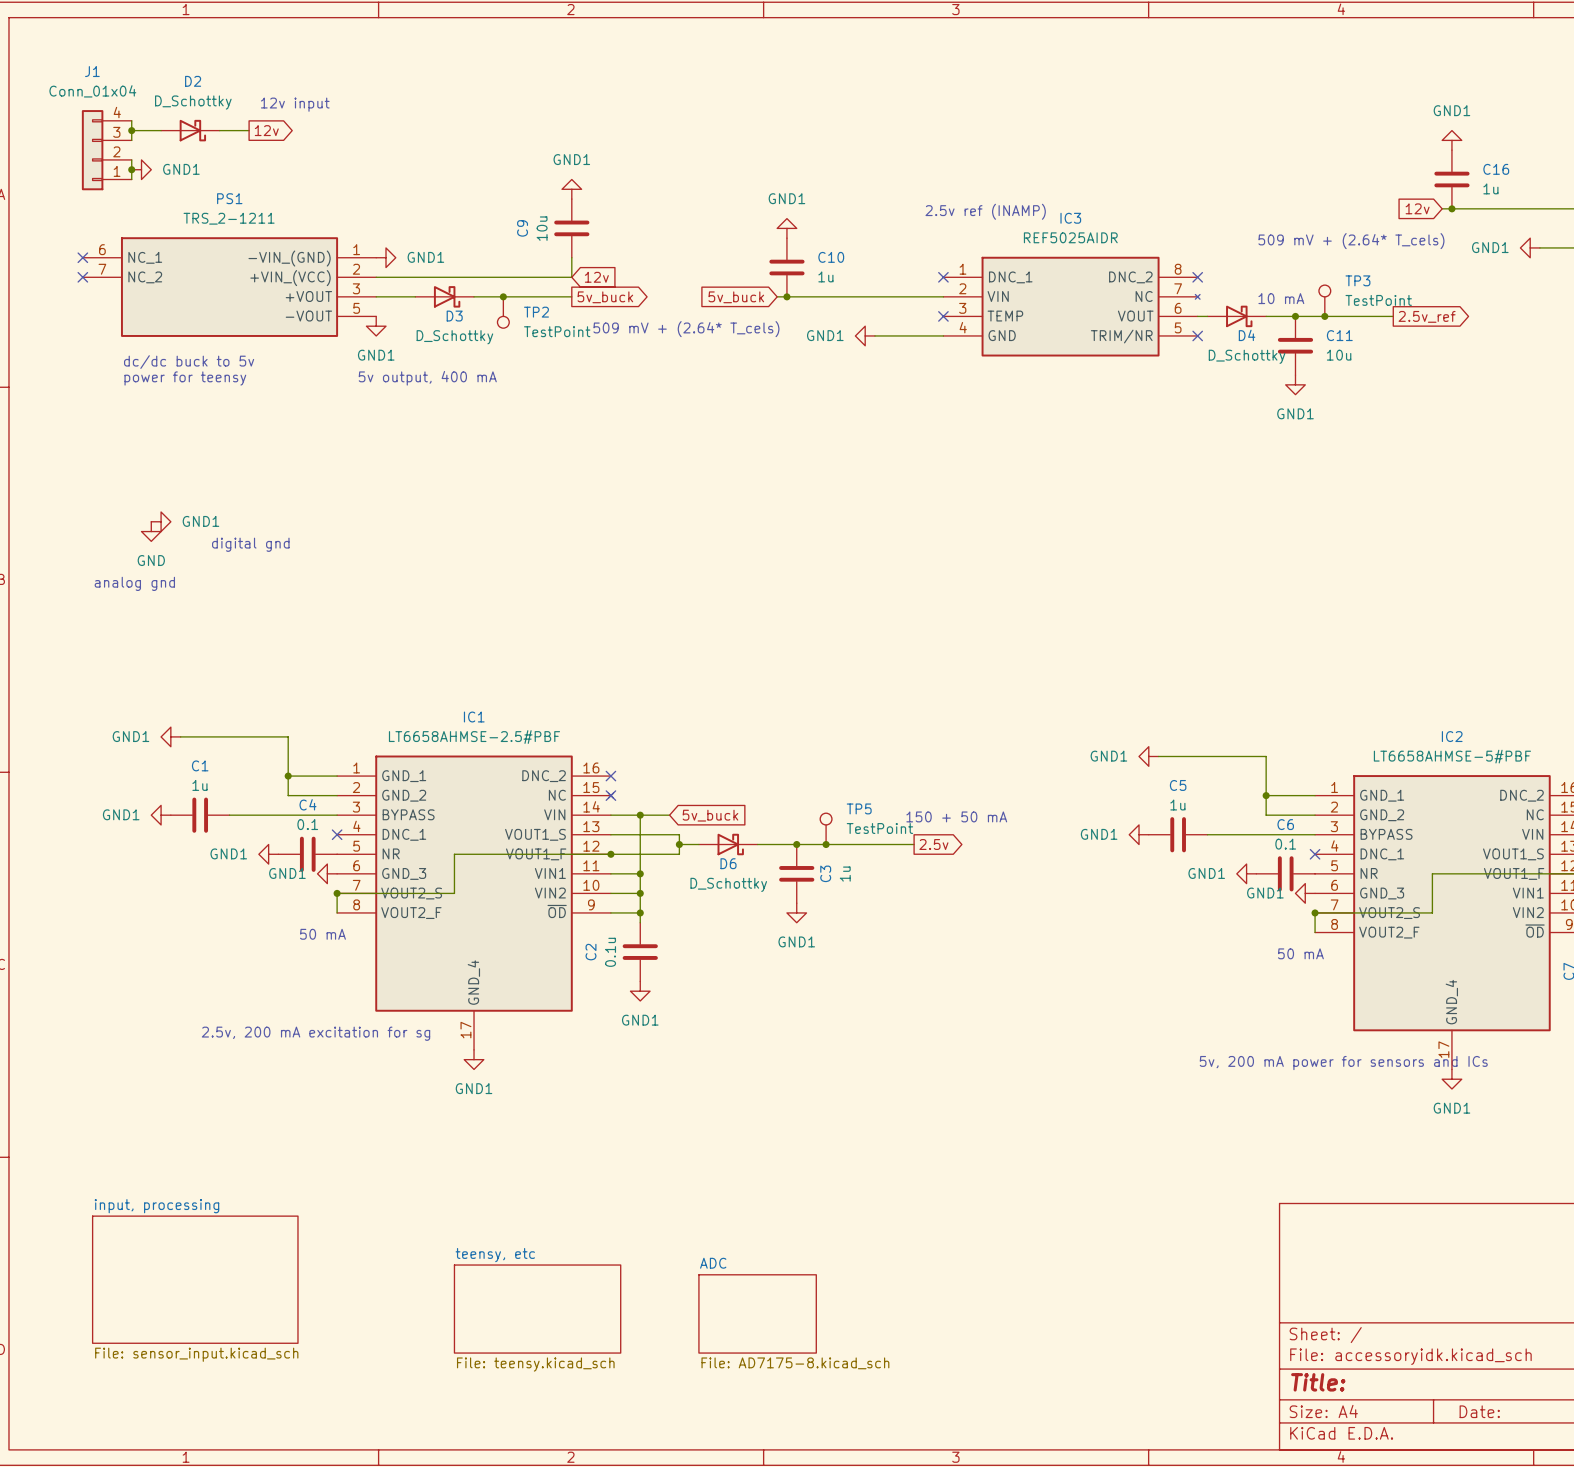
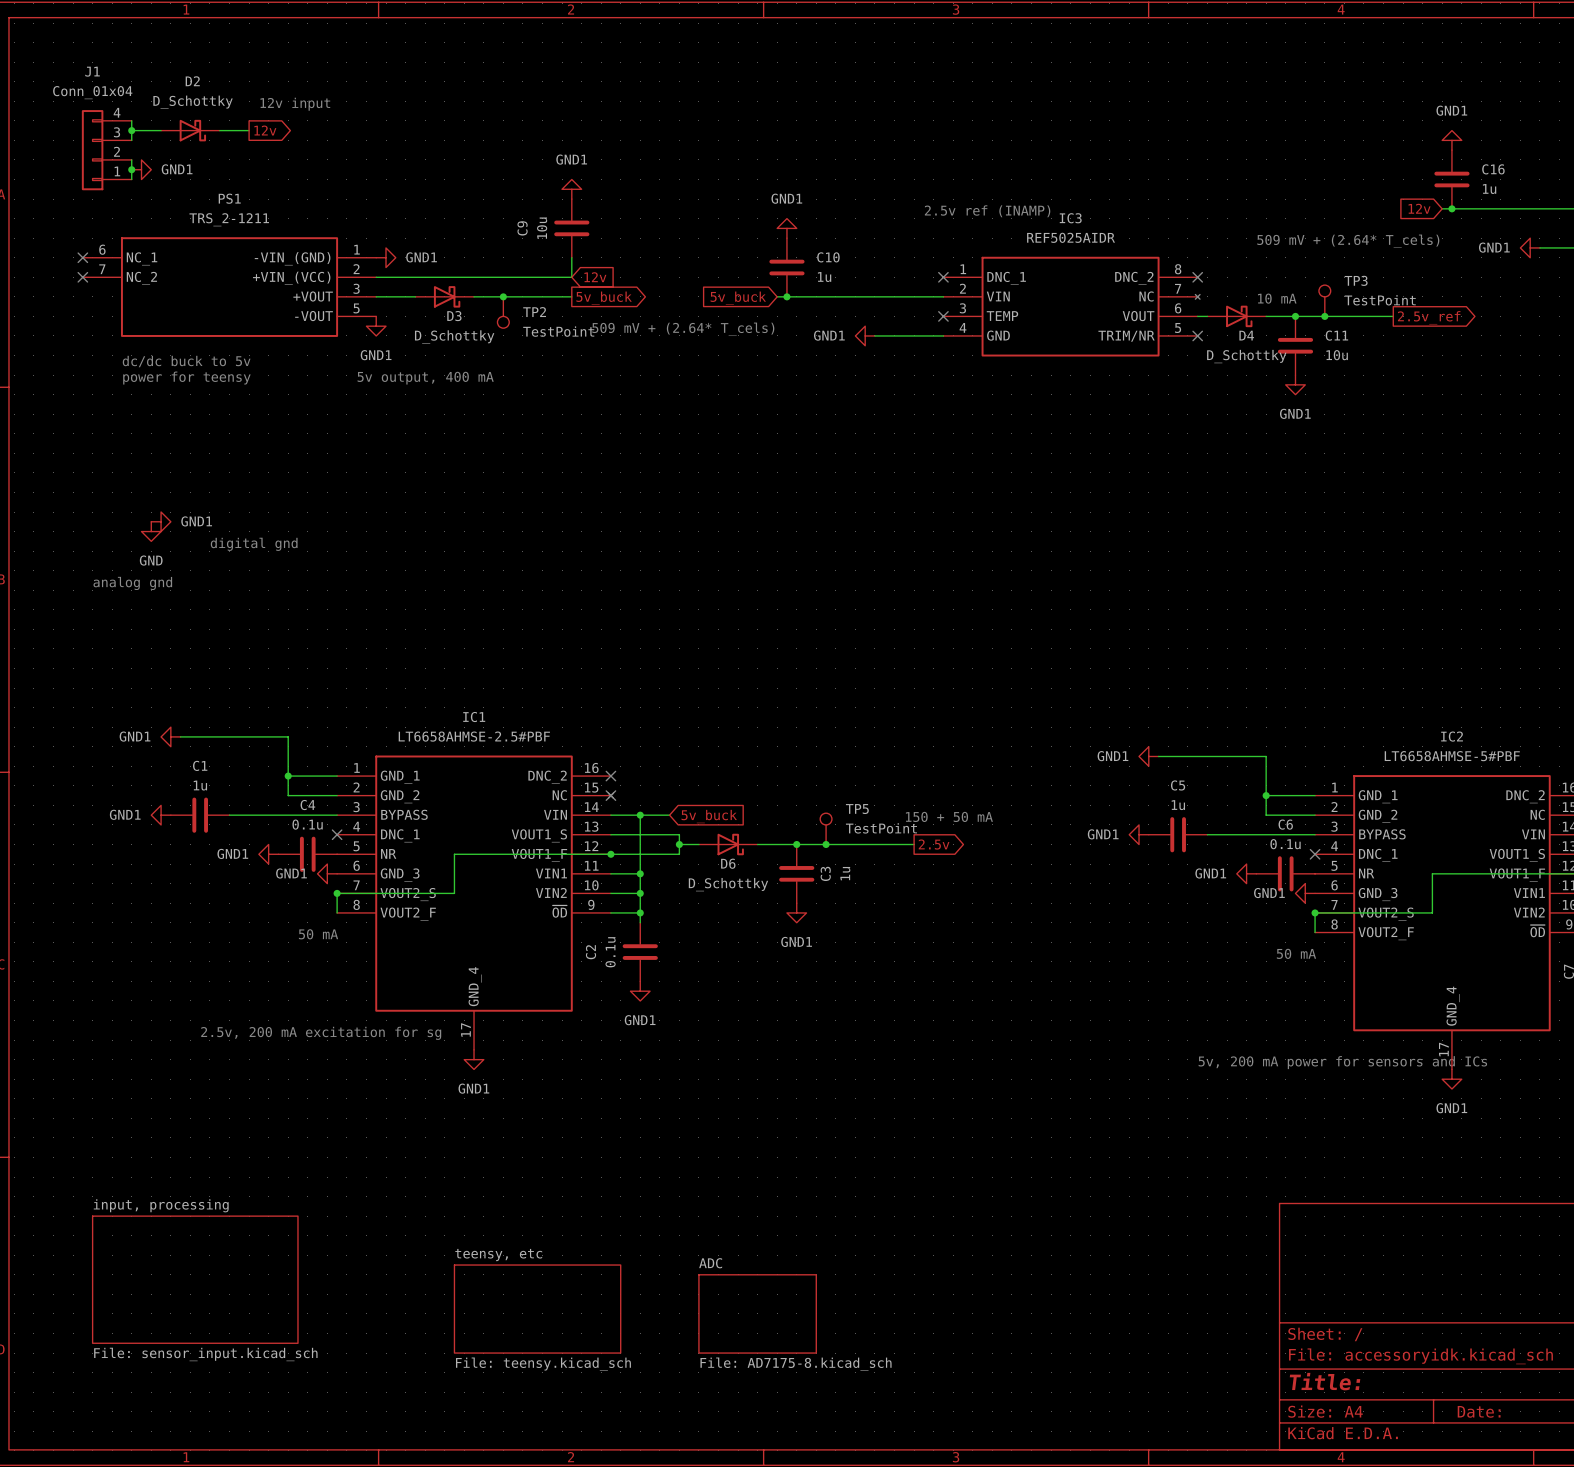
C4 value: 0.1 (307, 824) -> 0.1u (307, 824)
C6 value: 0.1 (1285, 844) -> 0.1u (1285, 844)

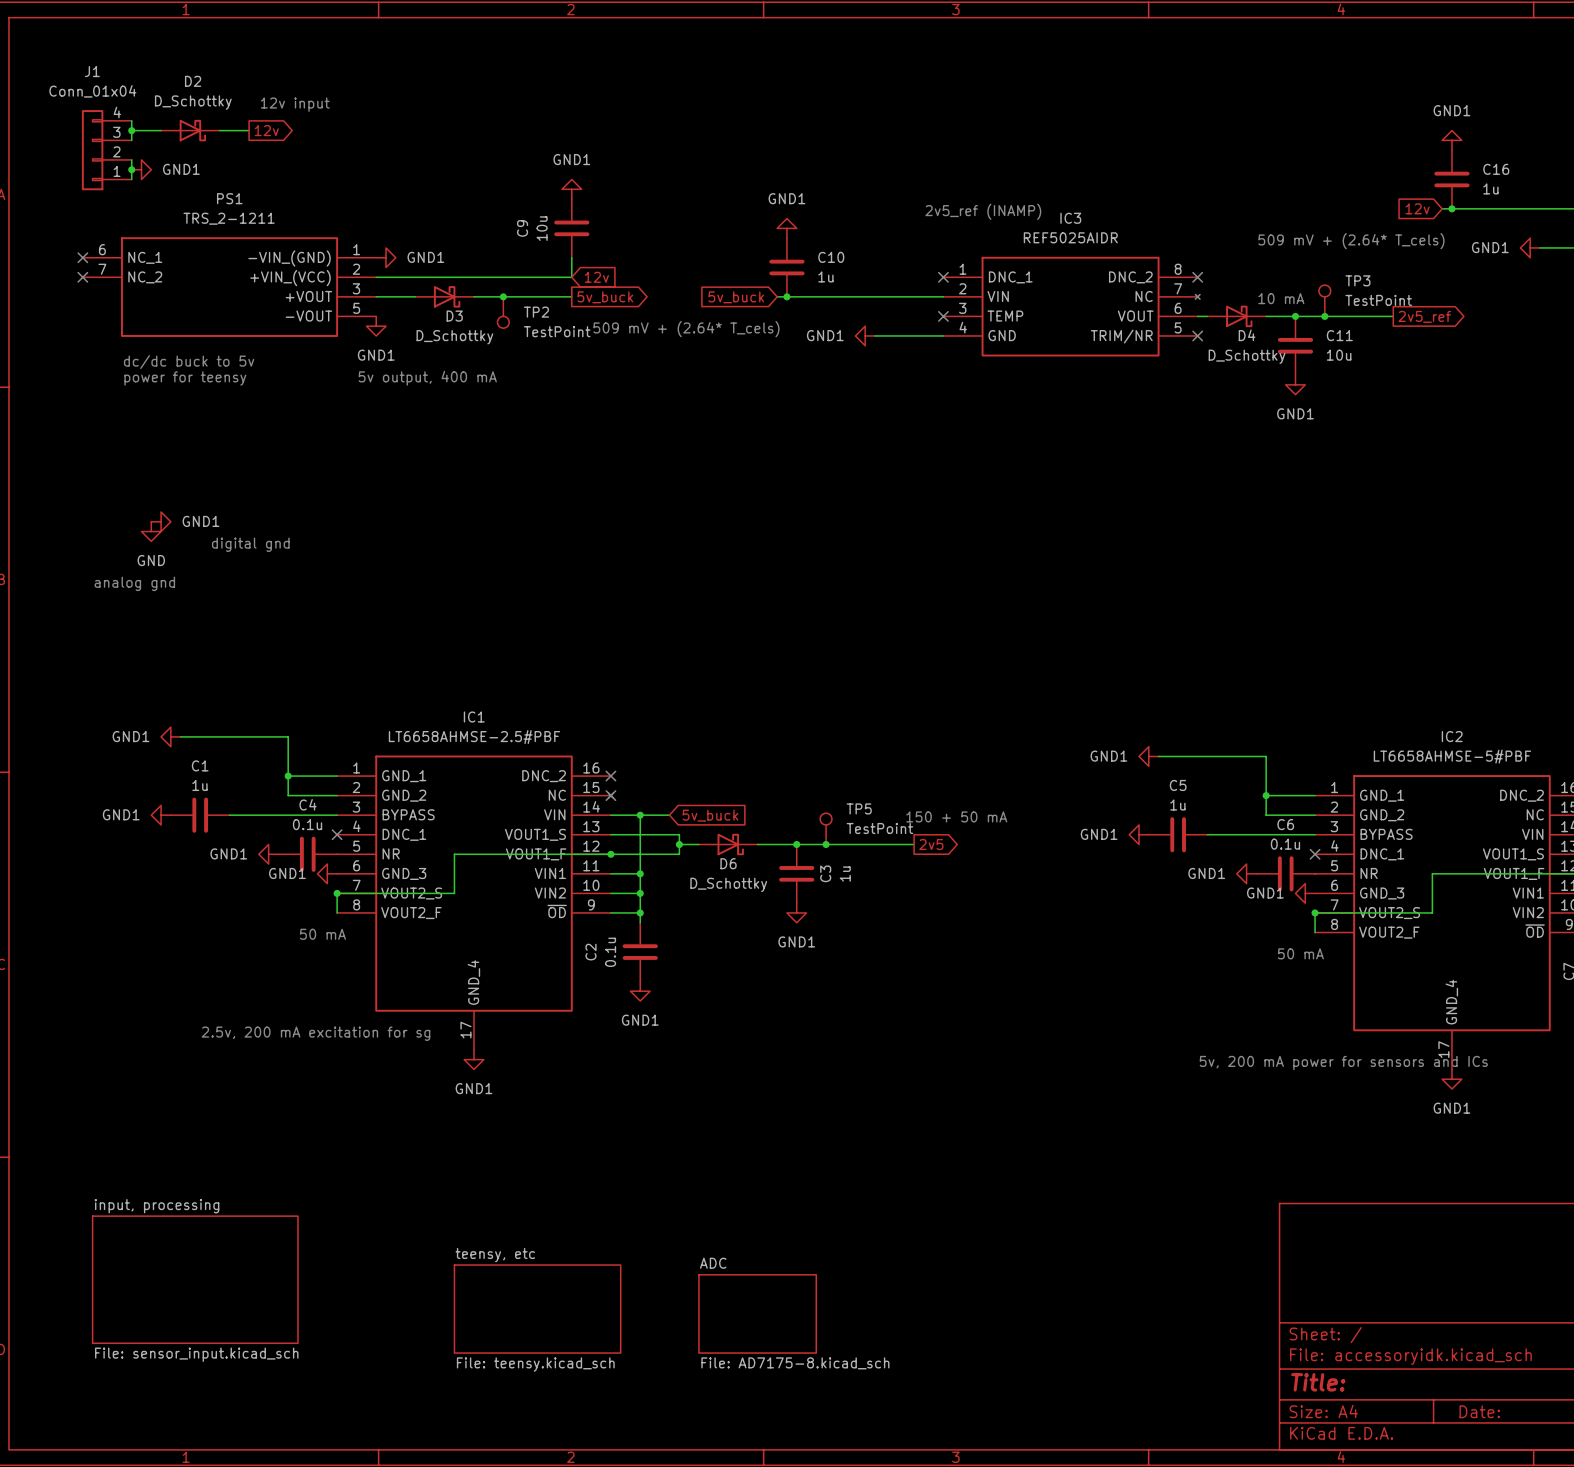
text: 2.5v ref (INAMP) (987, 211) -> 2v5_ref (INAMP) (983, 211)
global label: 2.5v_ref (1429, 317) -> 2v5_ref (1424, 316)
global label: 2.5v (934, 844) -> 2v5 (931, 844)

